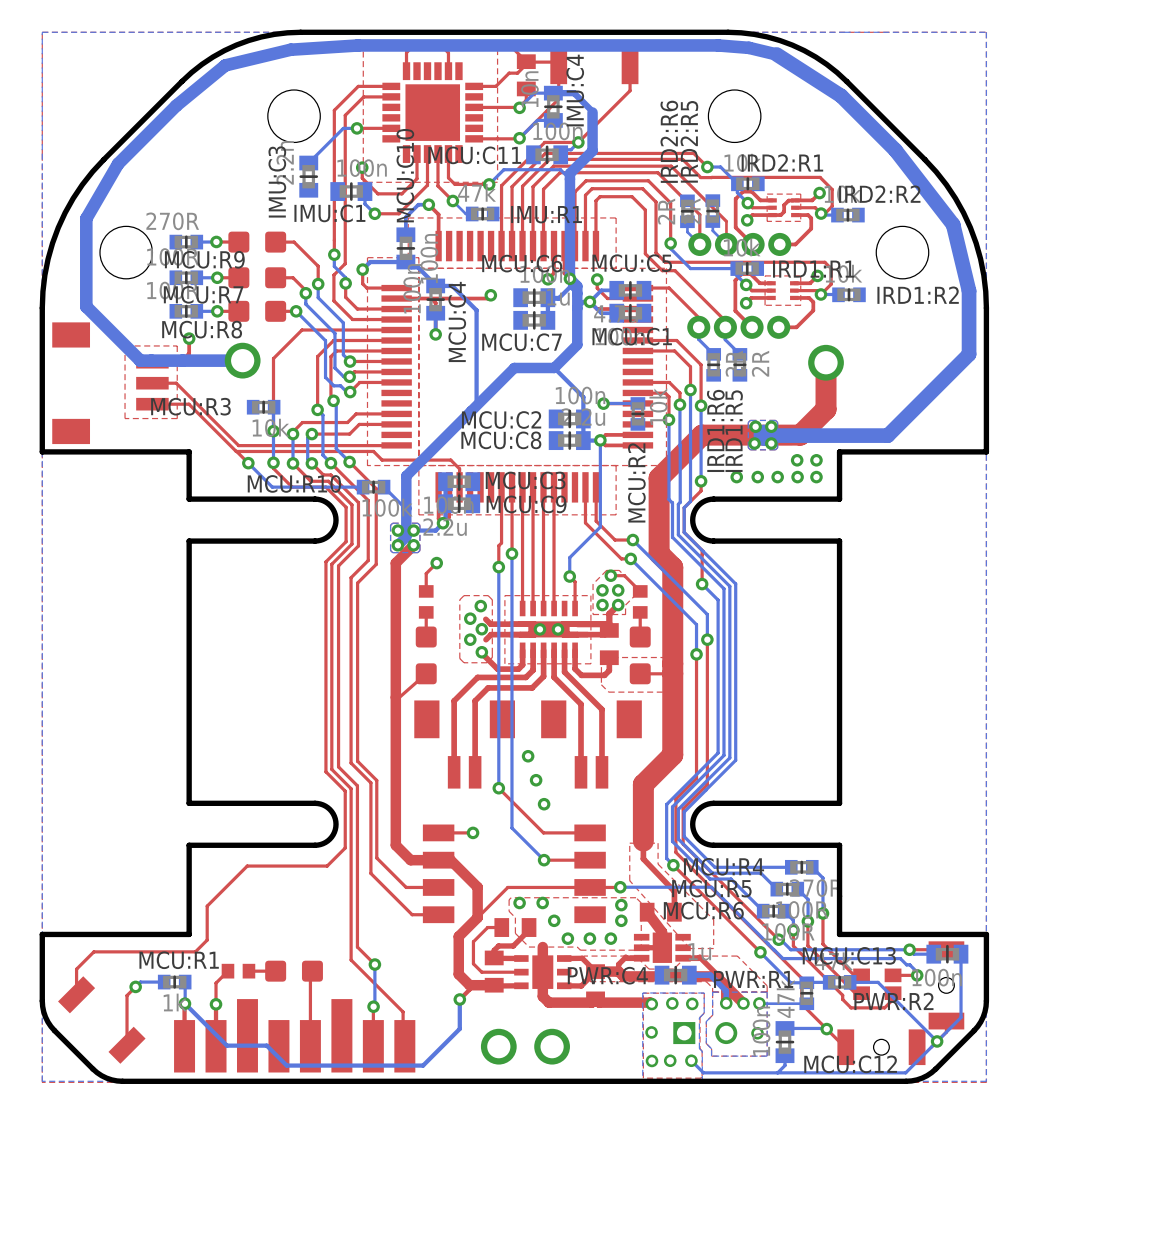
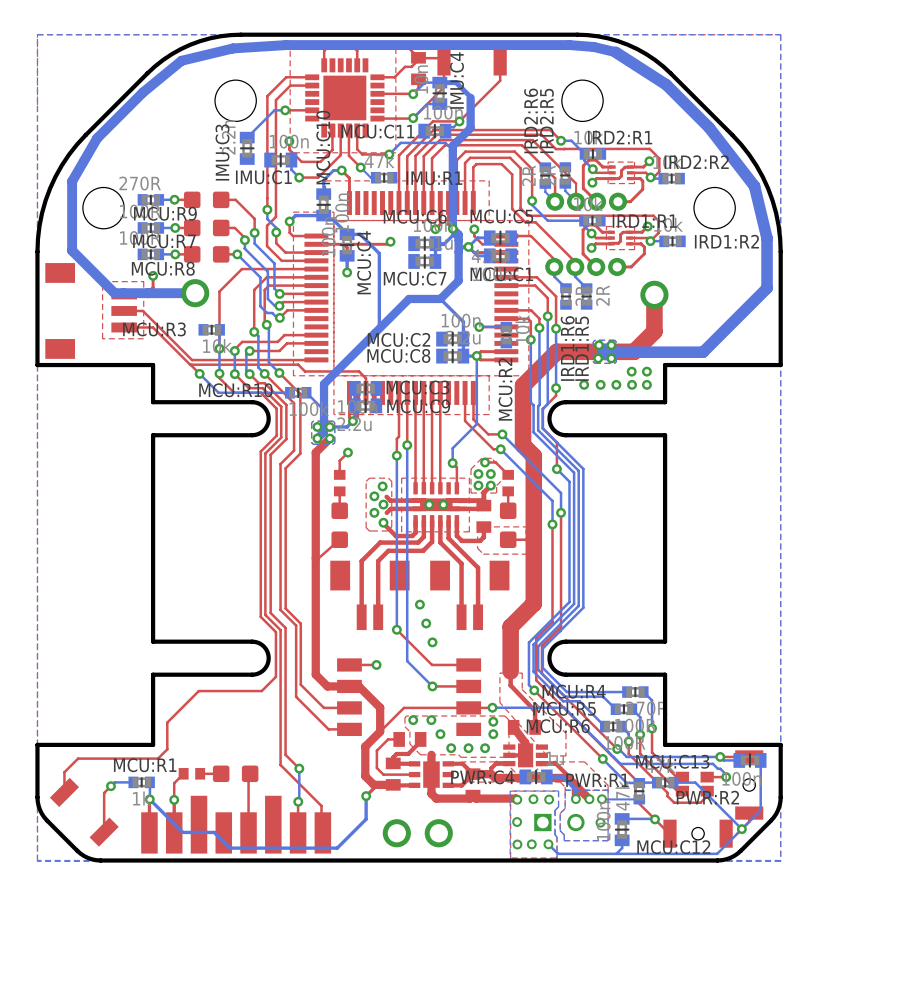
top track: none -> (629, 232) (623, 232) (620, 234) (620, 241) (611, 243)

